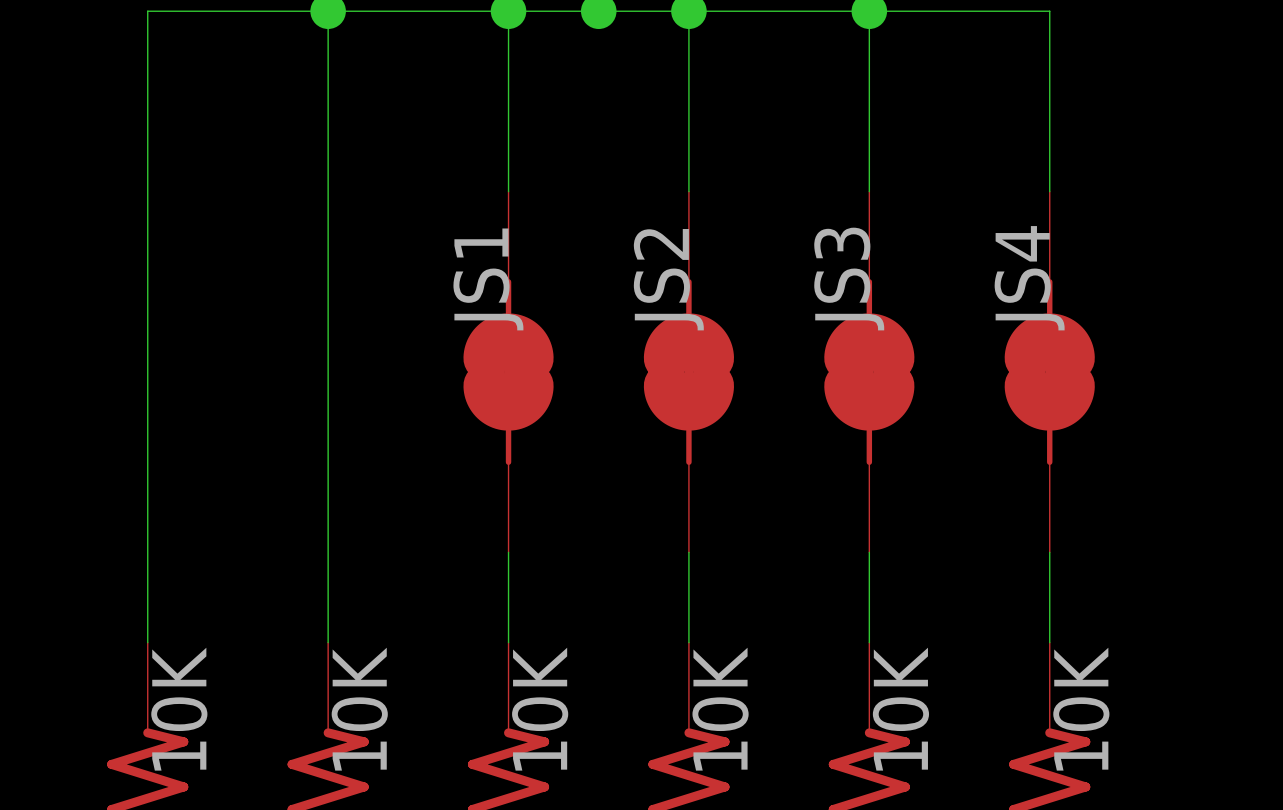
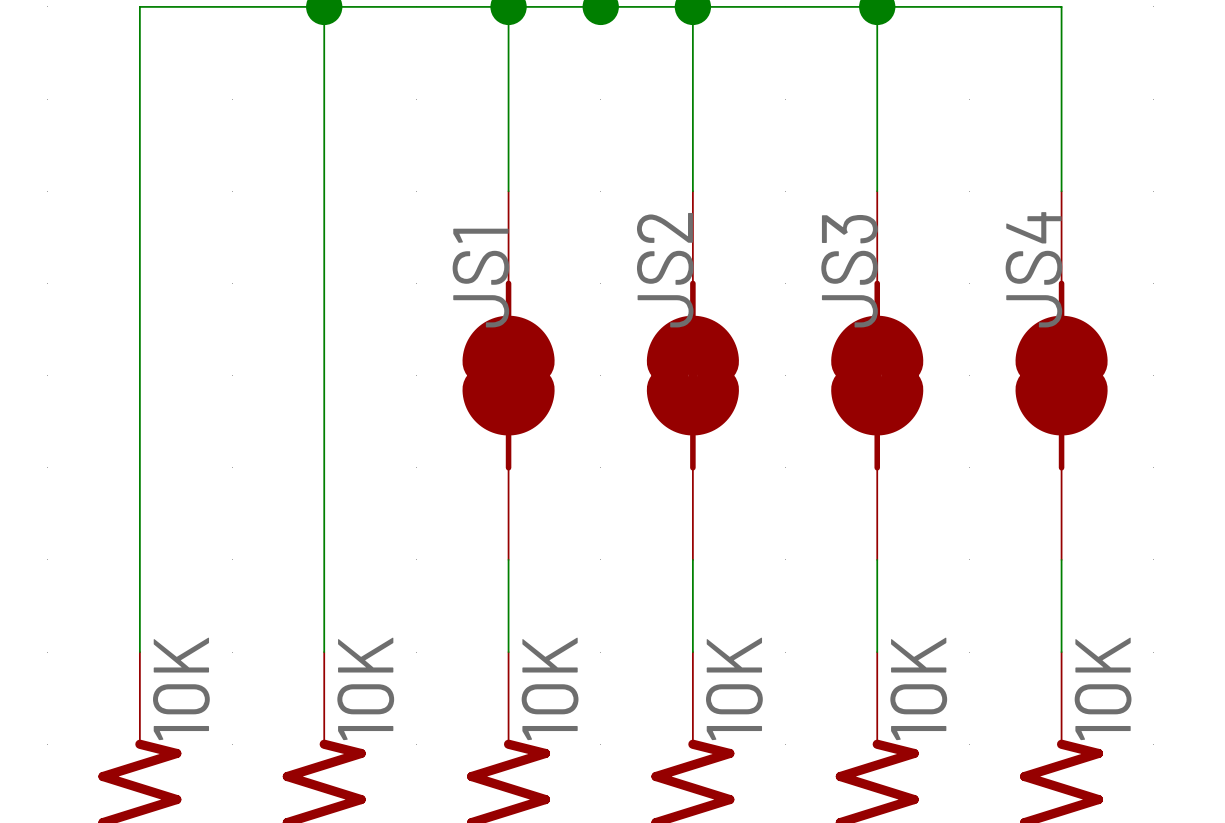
part value position: 10K (179, 709) -> 10K (181, 688)
part value position: 10K (359, 709) -> 10K (365, 688)
part value position: 10K (540, 709) -> 10K (550, 688)
part value position: 10K (720, 709) -> 10K (734, 688)
part value position: 10K (900, 709) -> 10K (918, 688)
part value position: 10K (1081, 709) -> 10K (1103, 688)

